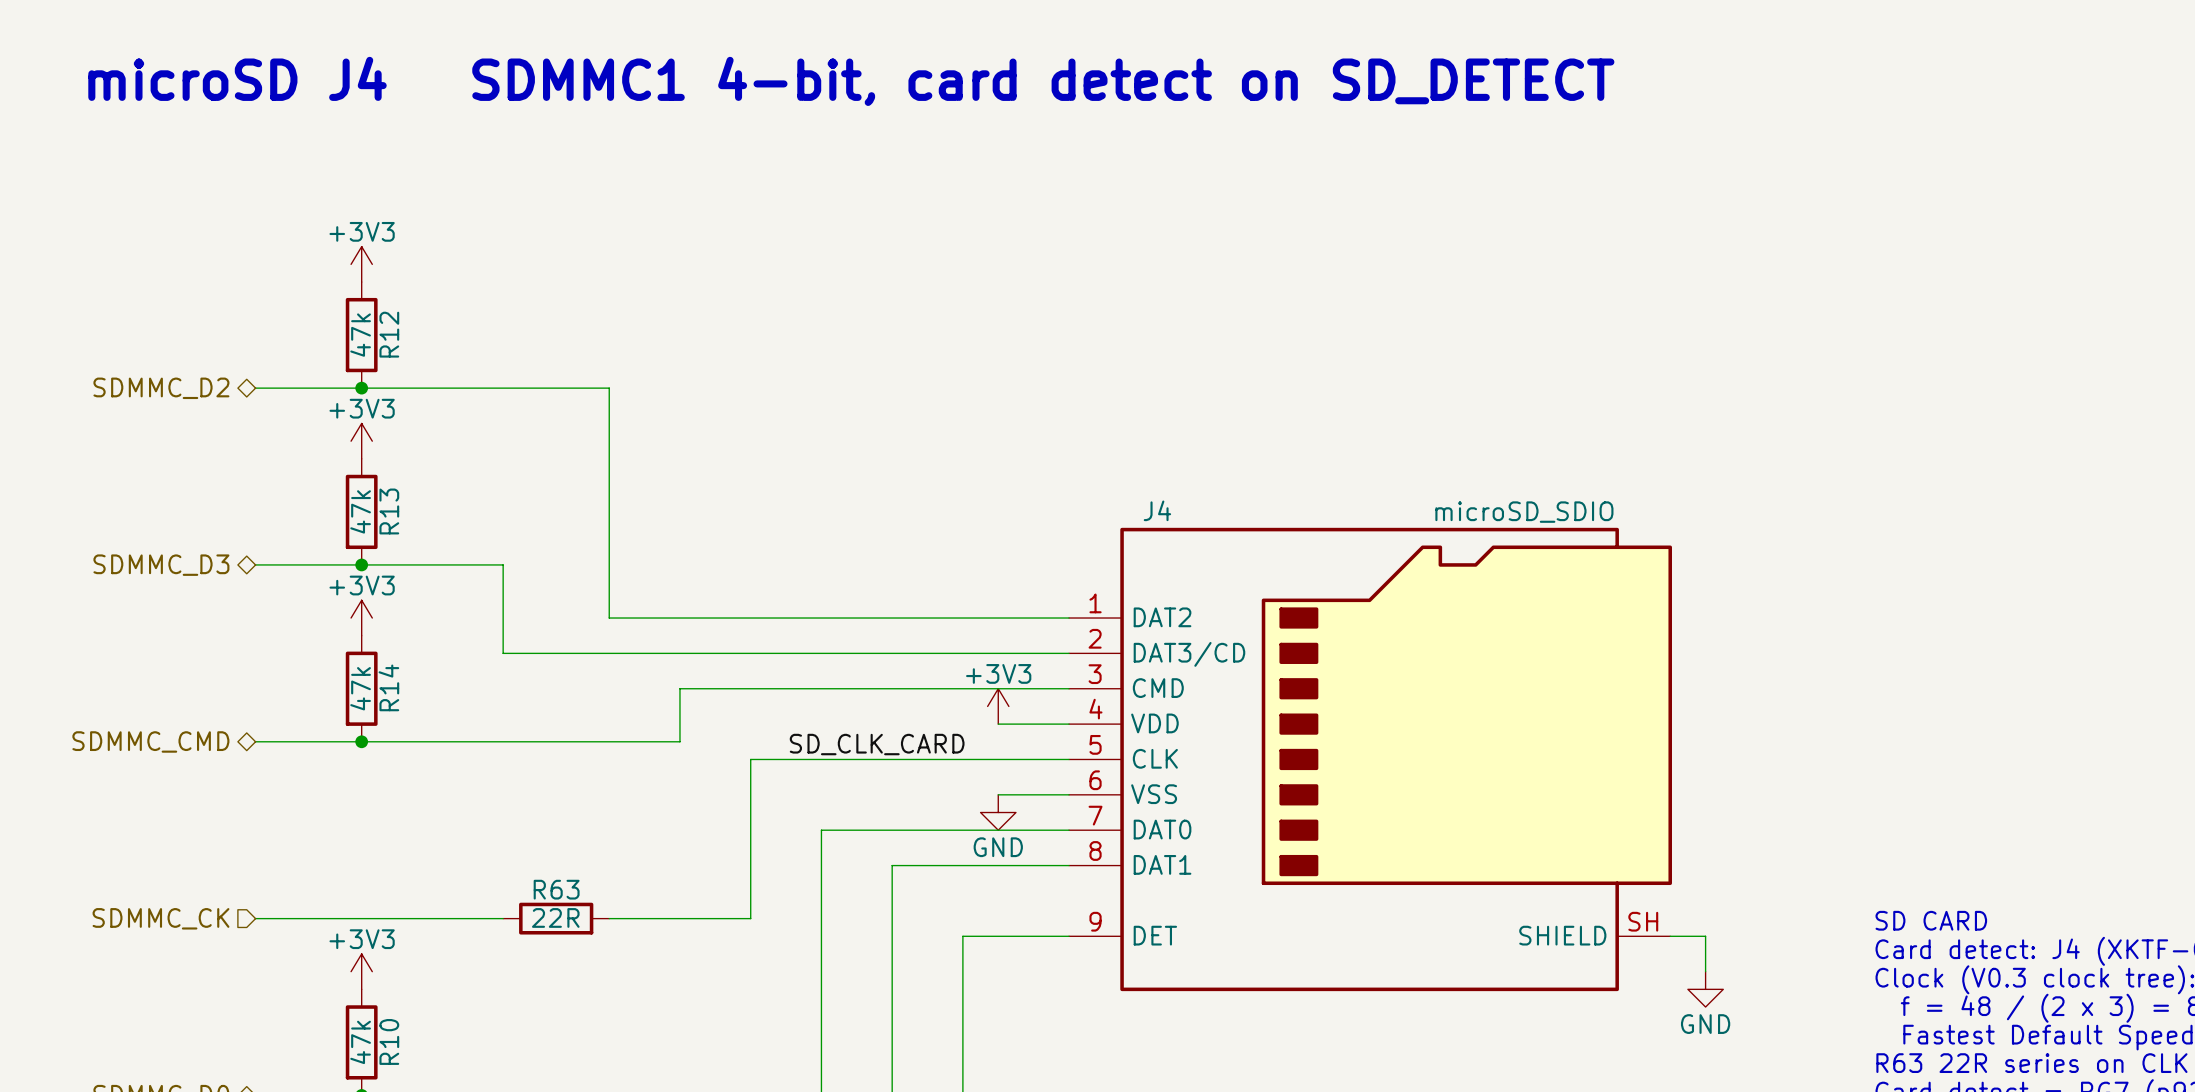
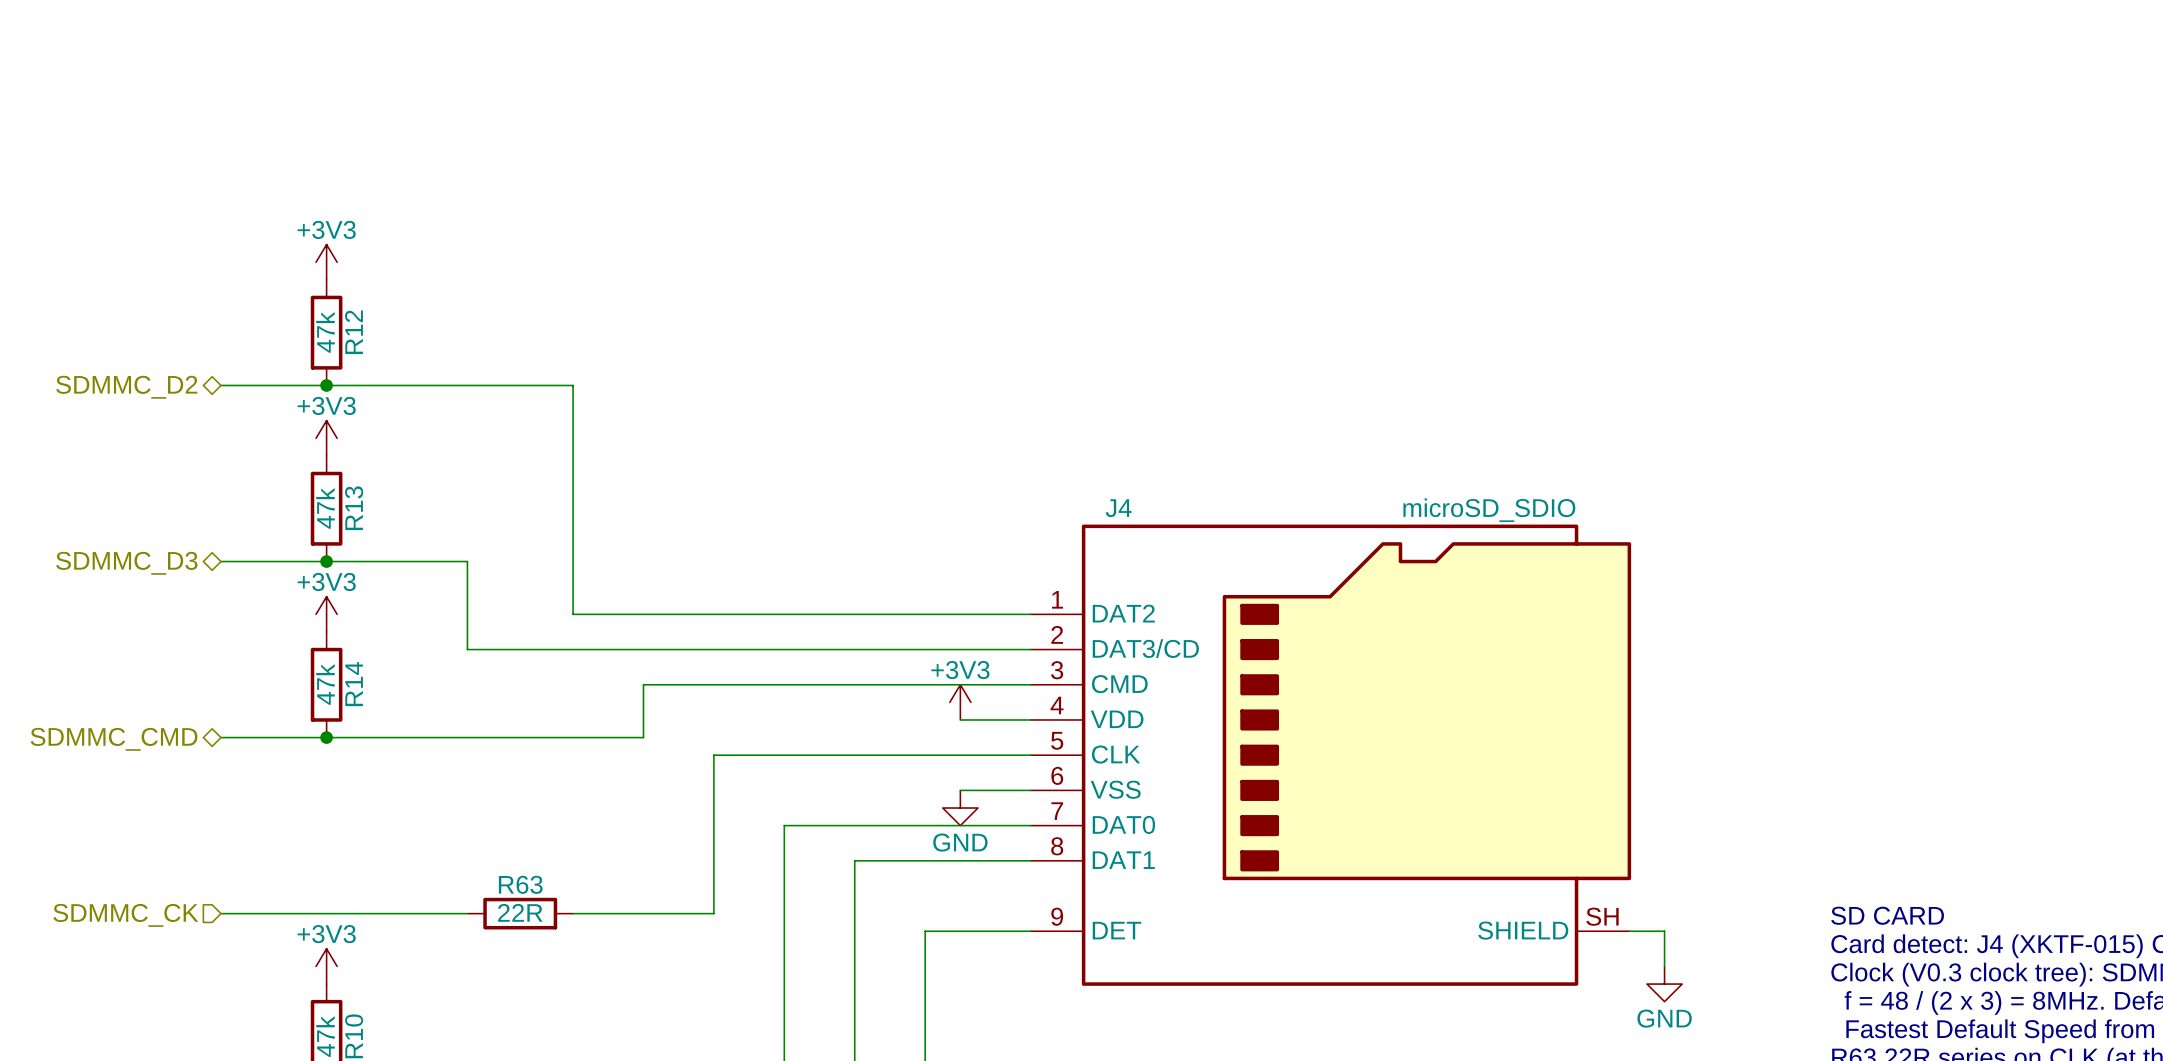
text: microSD J4 SDMMC1 4-bit, card detect on SD_DETECT (851, 81) -> none
label: SD_CLK_CARD (877, 744) -> none

